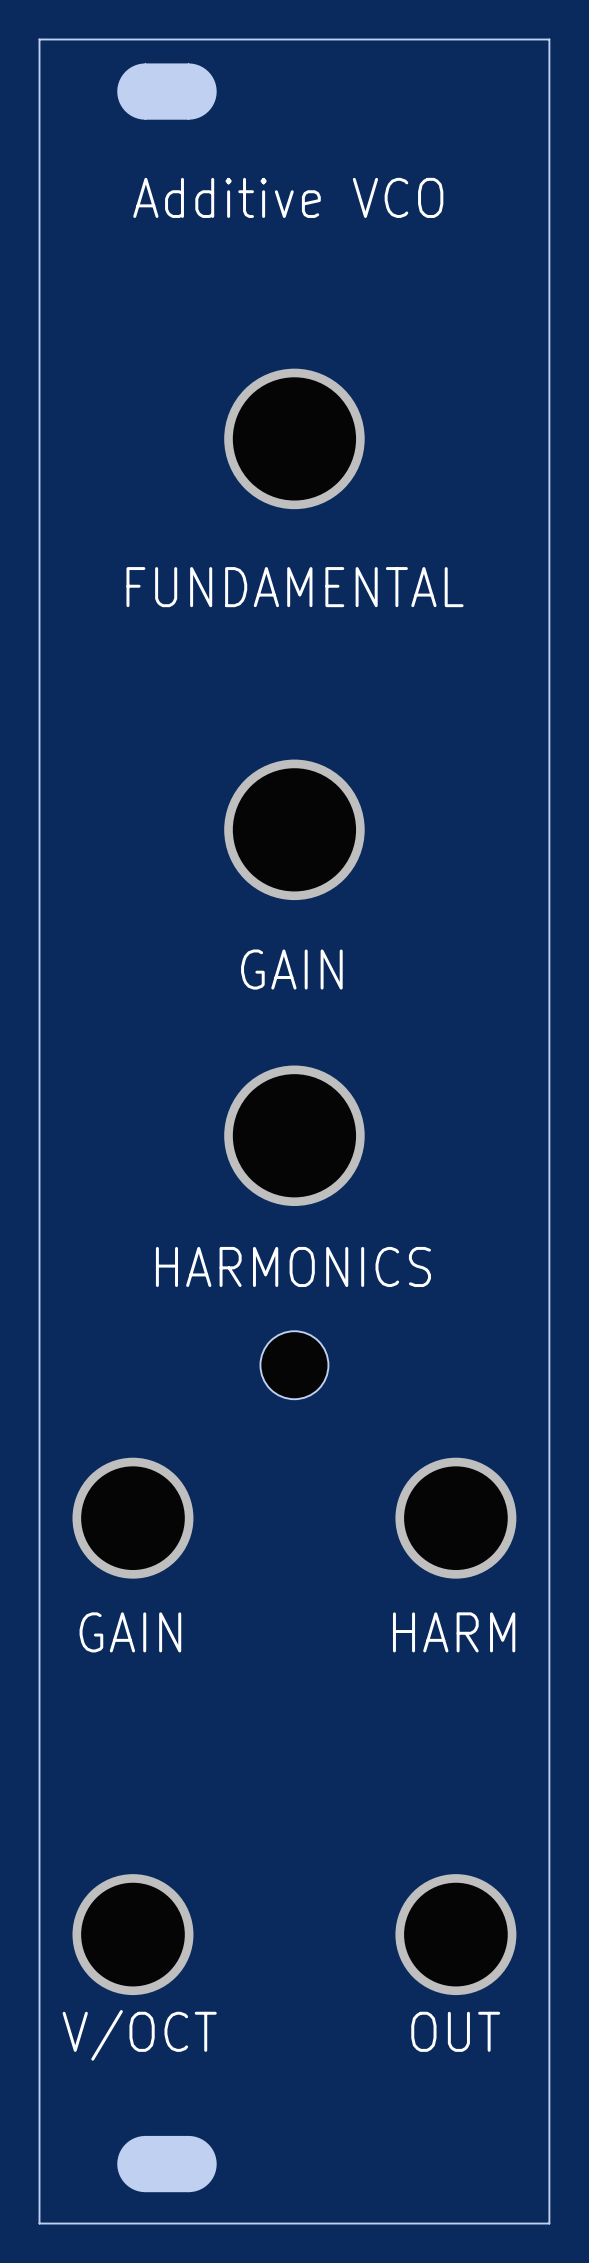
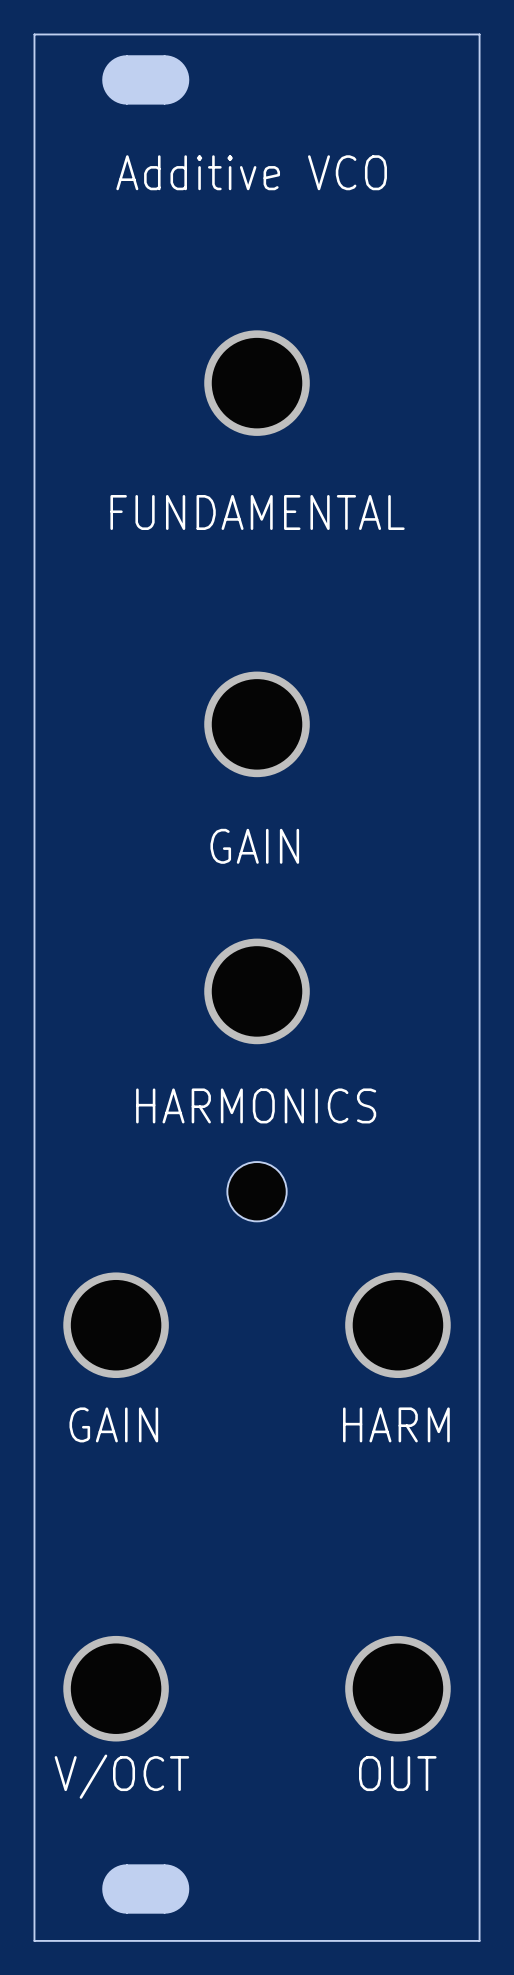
via size: [224, 368, 365, 510] -> [204, 330, 310, 436]
via size: [224, 759, 365, 901] -> [204, 671, 310, 778]
via size: [224, 1065, 365, 1207] -> [204, 938, 310, 1045]

